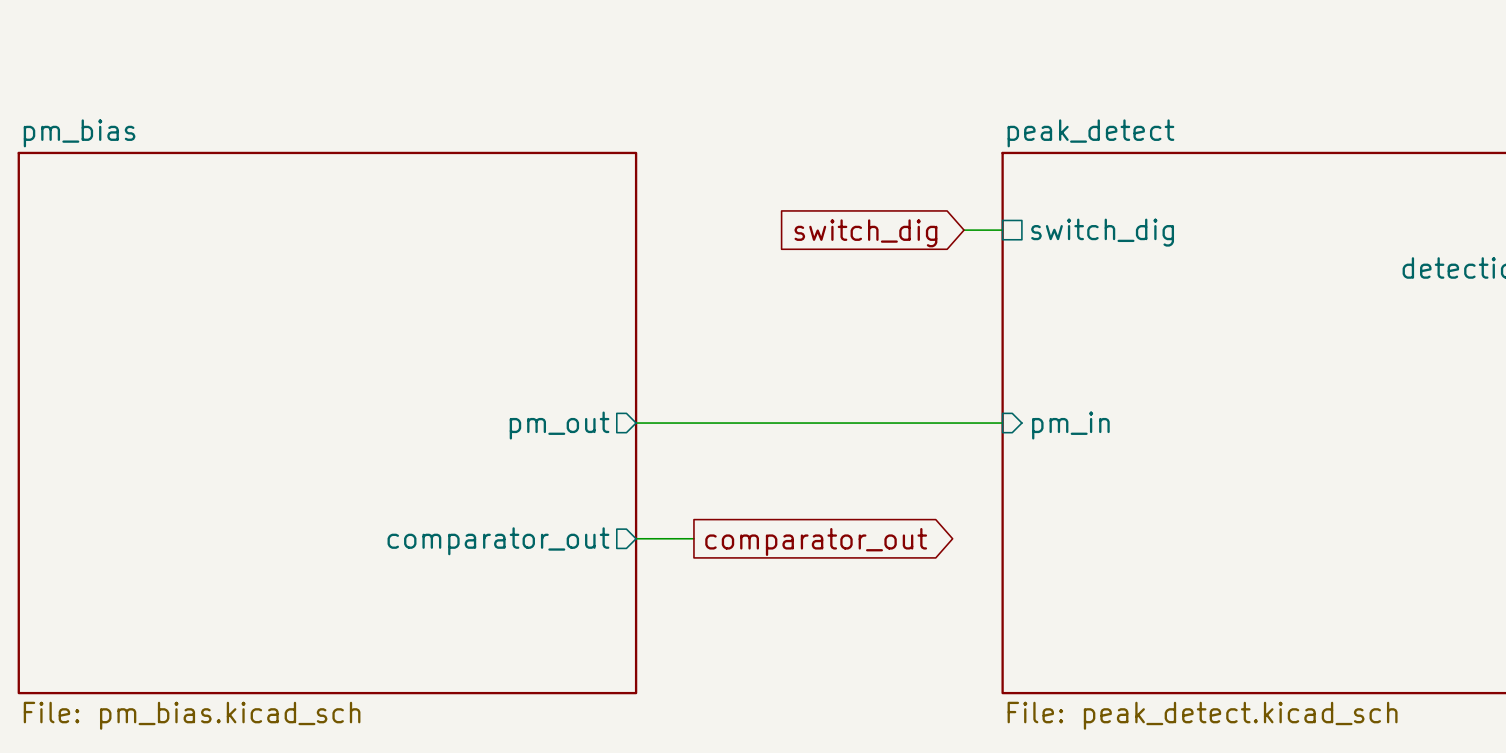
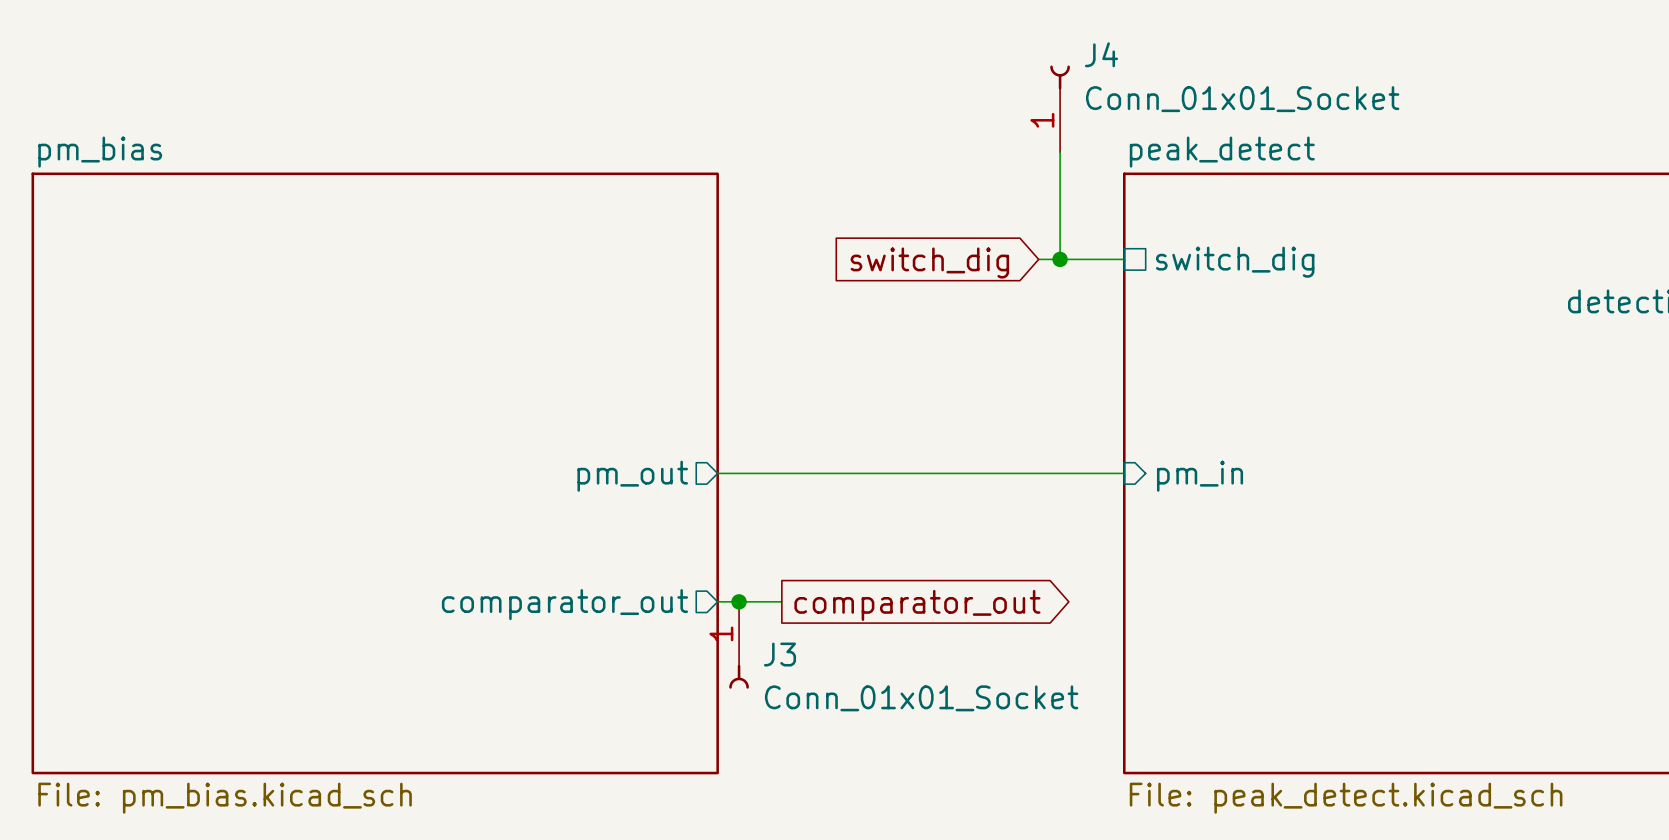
J4: none -> Conn_01x01_Socket (1060, 108)
wire: none -> (1060, 152) (1060, 259)
wire: none -> (1038, 259) (1081, 259)
junction: none -> (1060, 259)
global label position: switch_dig (865, 233) -> switch_dig (929, 262)
junction: none -> (739, 601)
J3: none -> Conn_01x01_Socket (739, 645)

